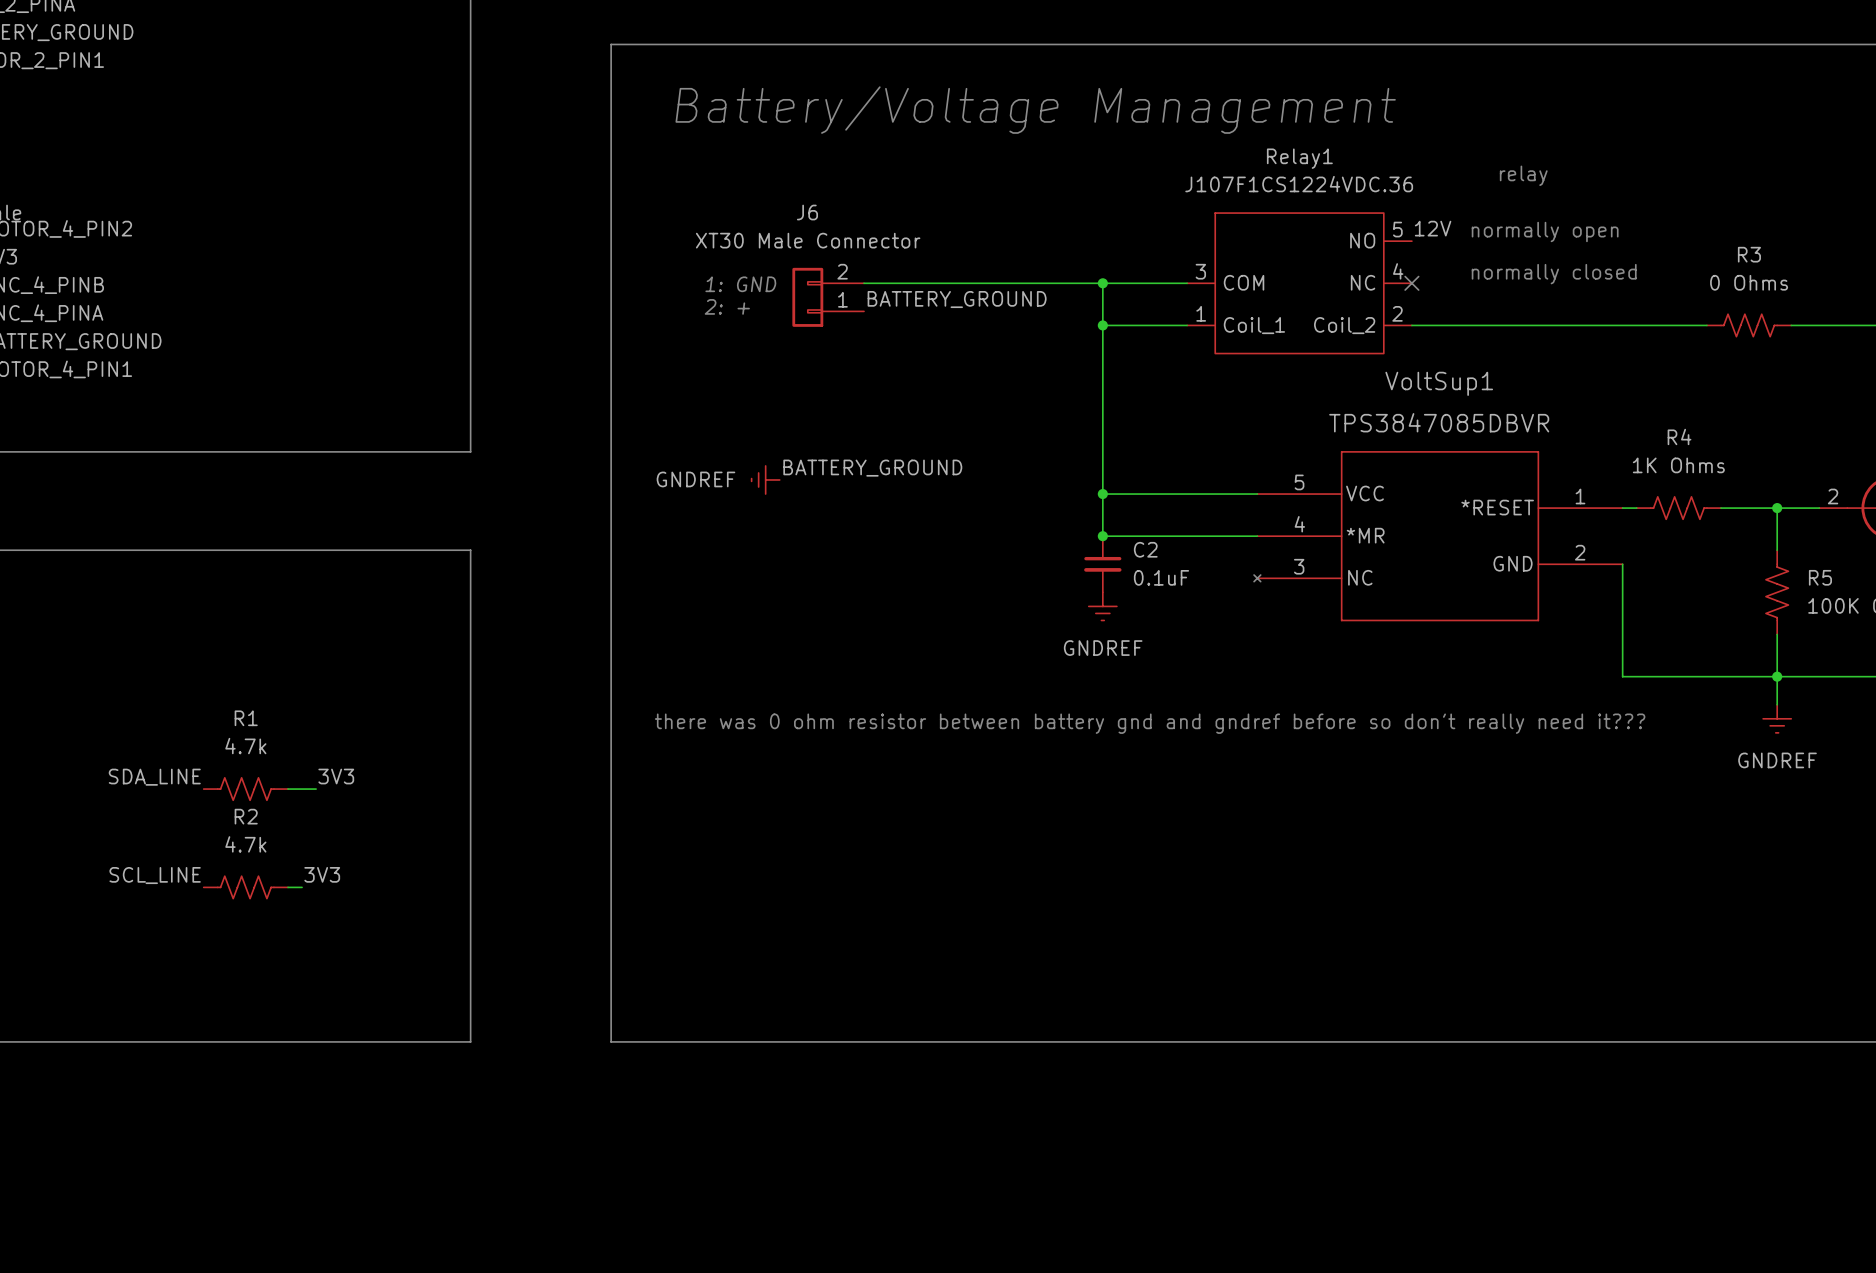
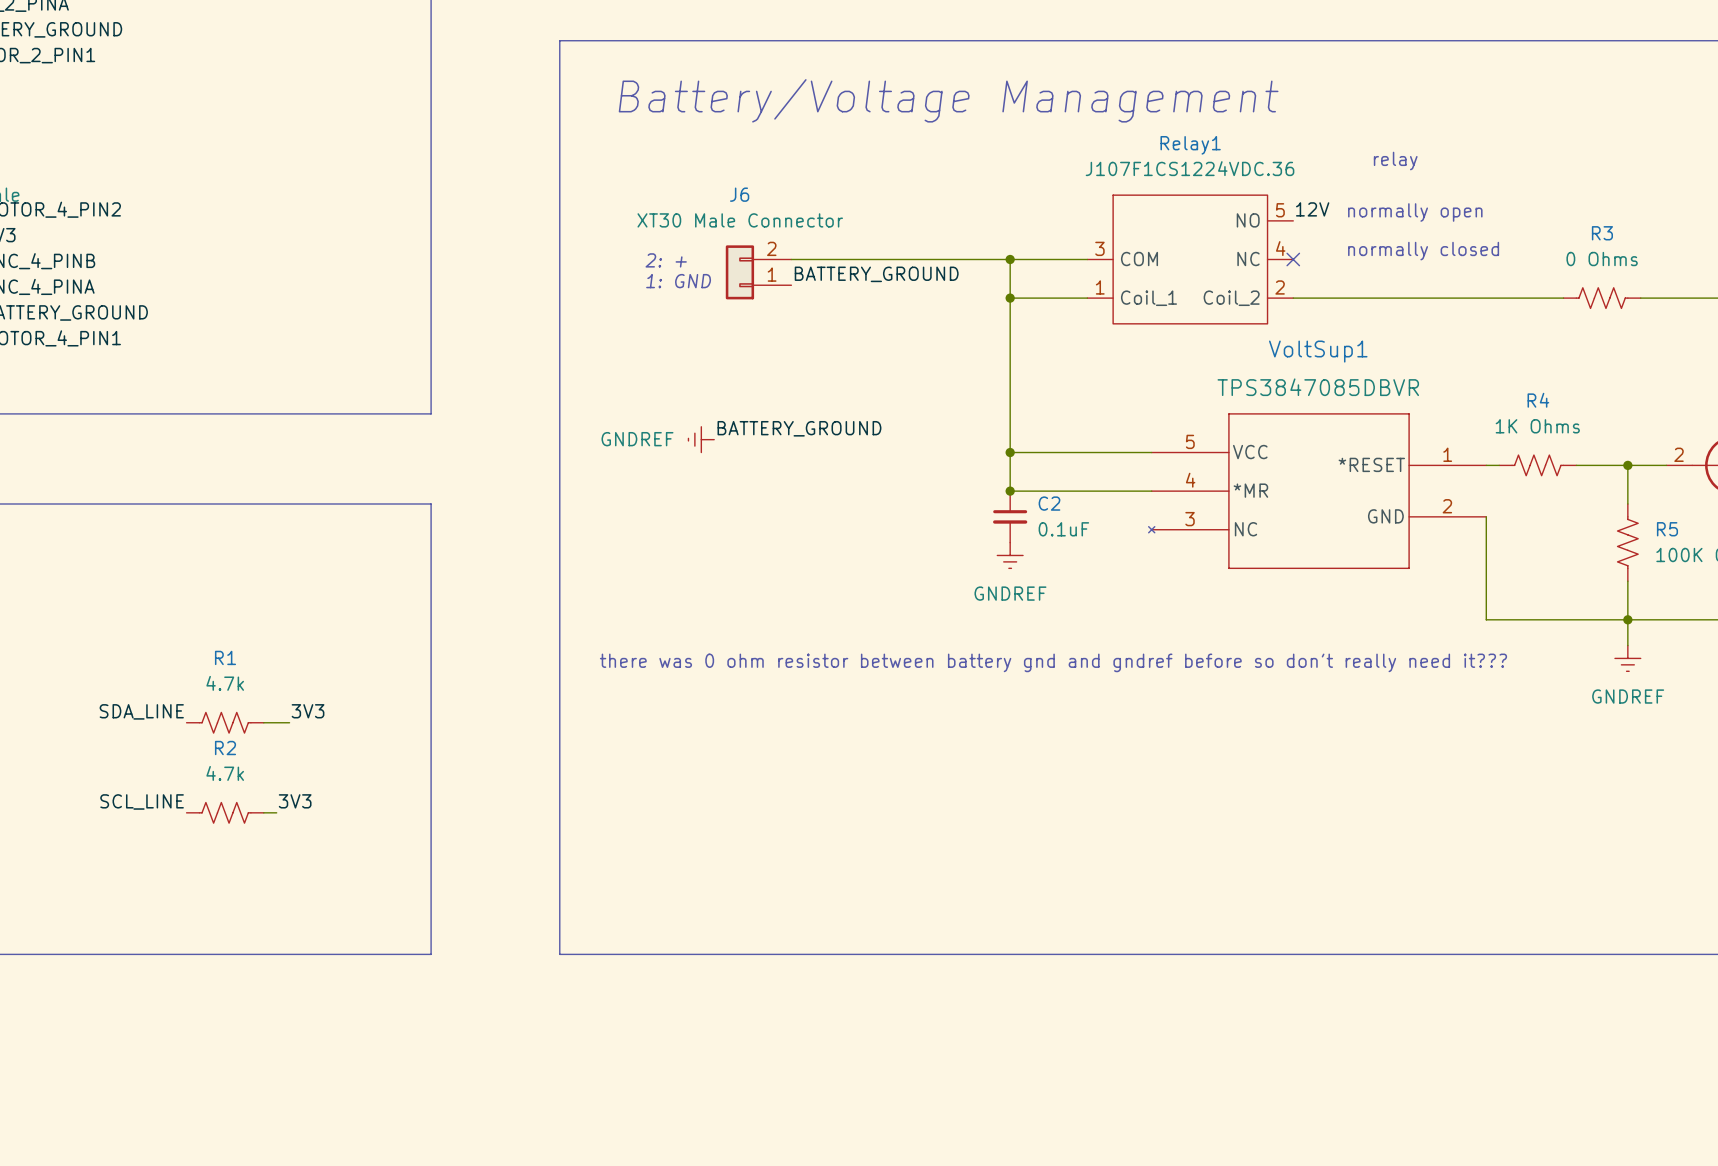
text: 1: GND (740, 284) -> 2: + (666, 260)
text: 2: + (727, 306) -> 1: GND (678, 281)

